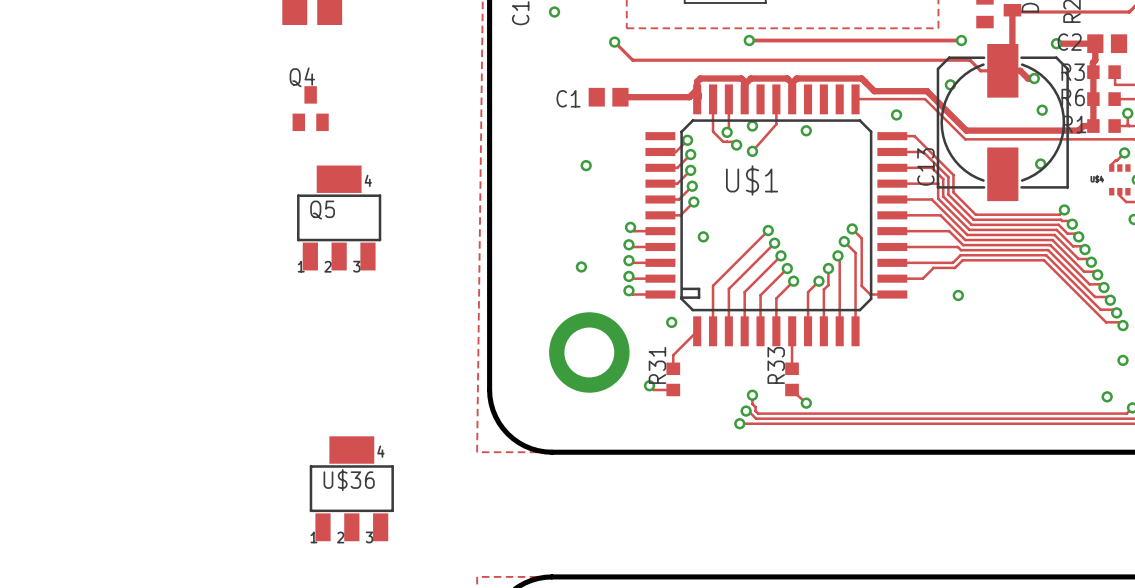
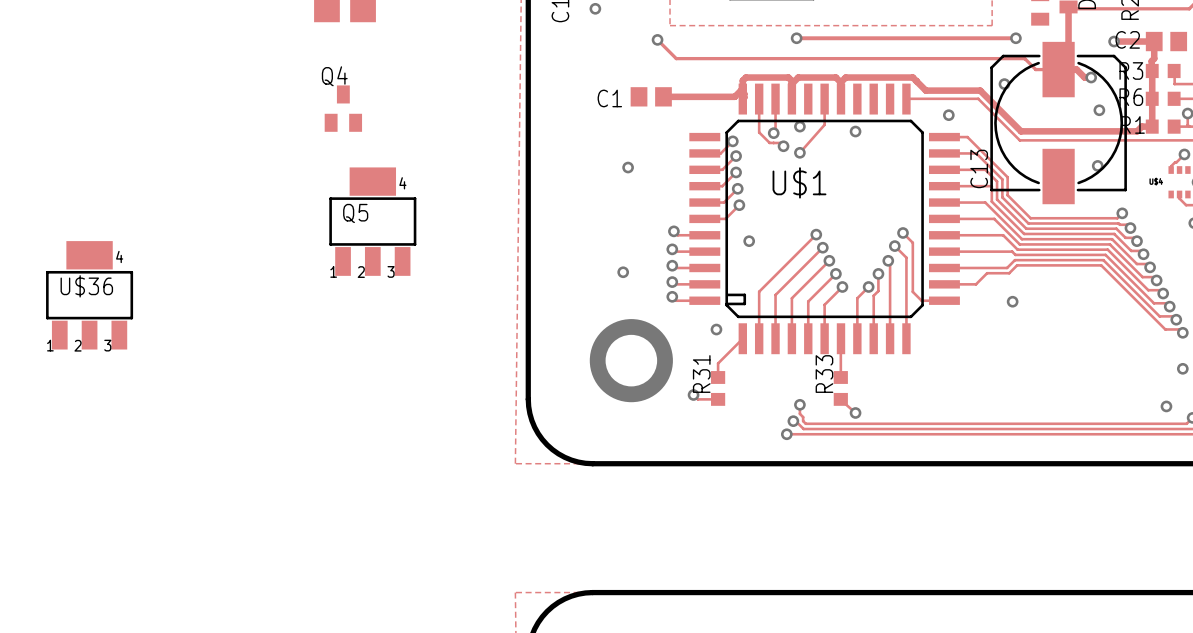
U$36 position: (351, 488) -> (89, 295)

